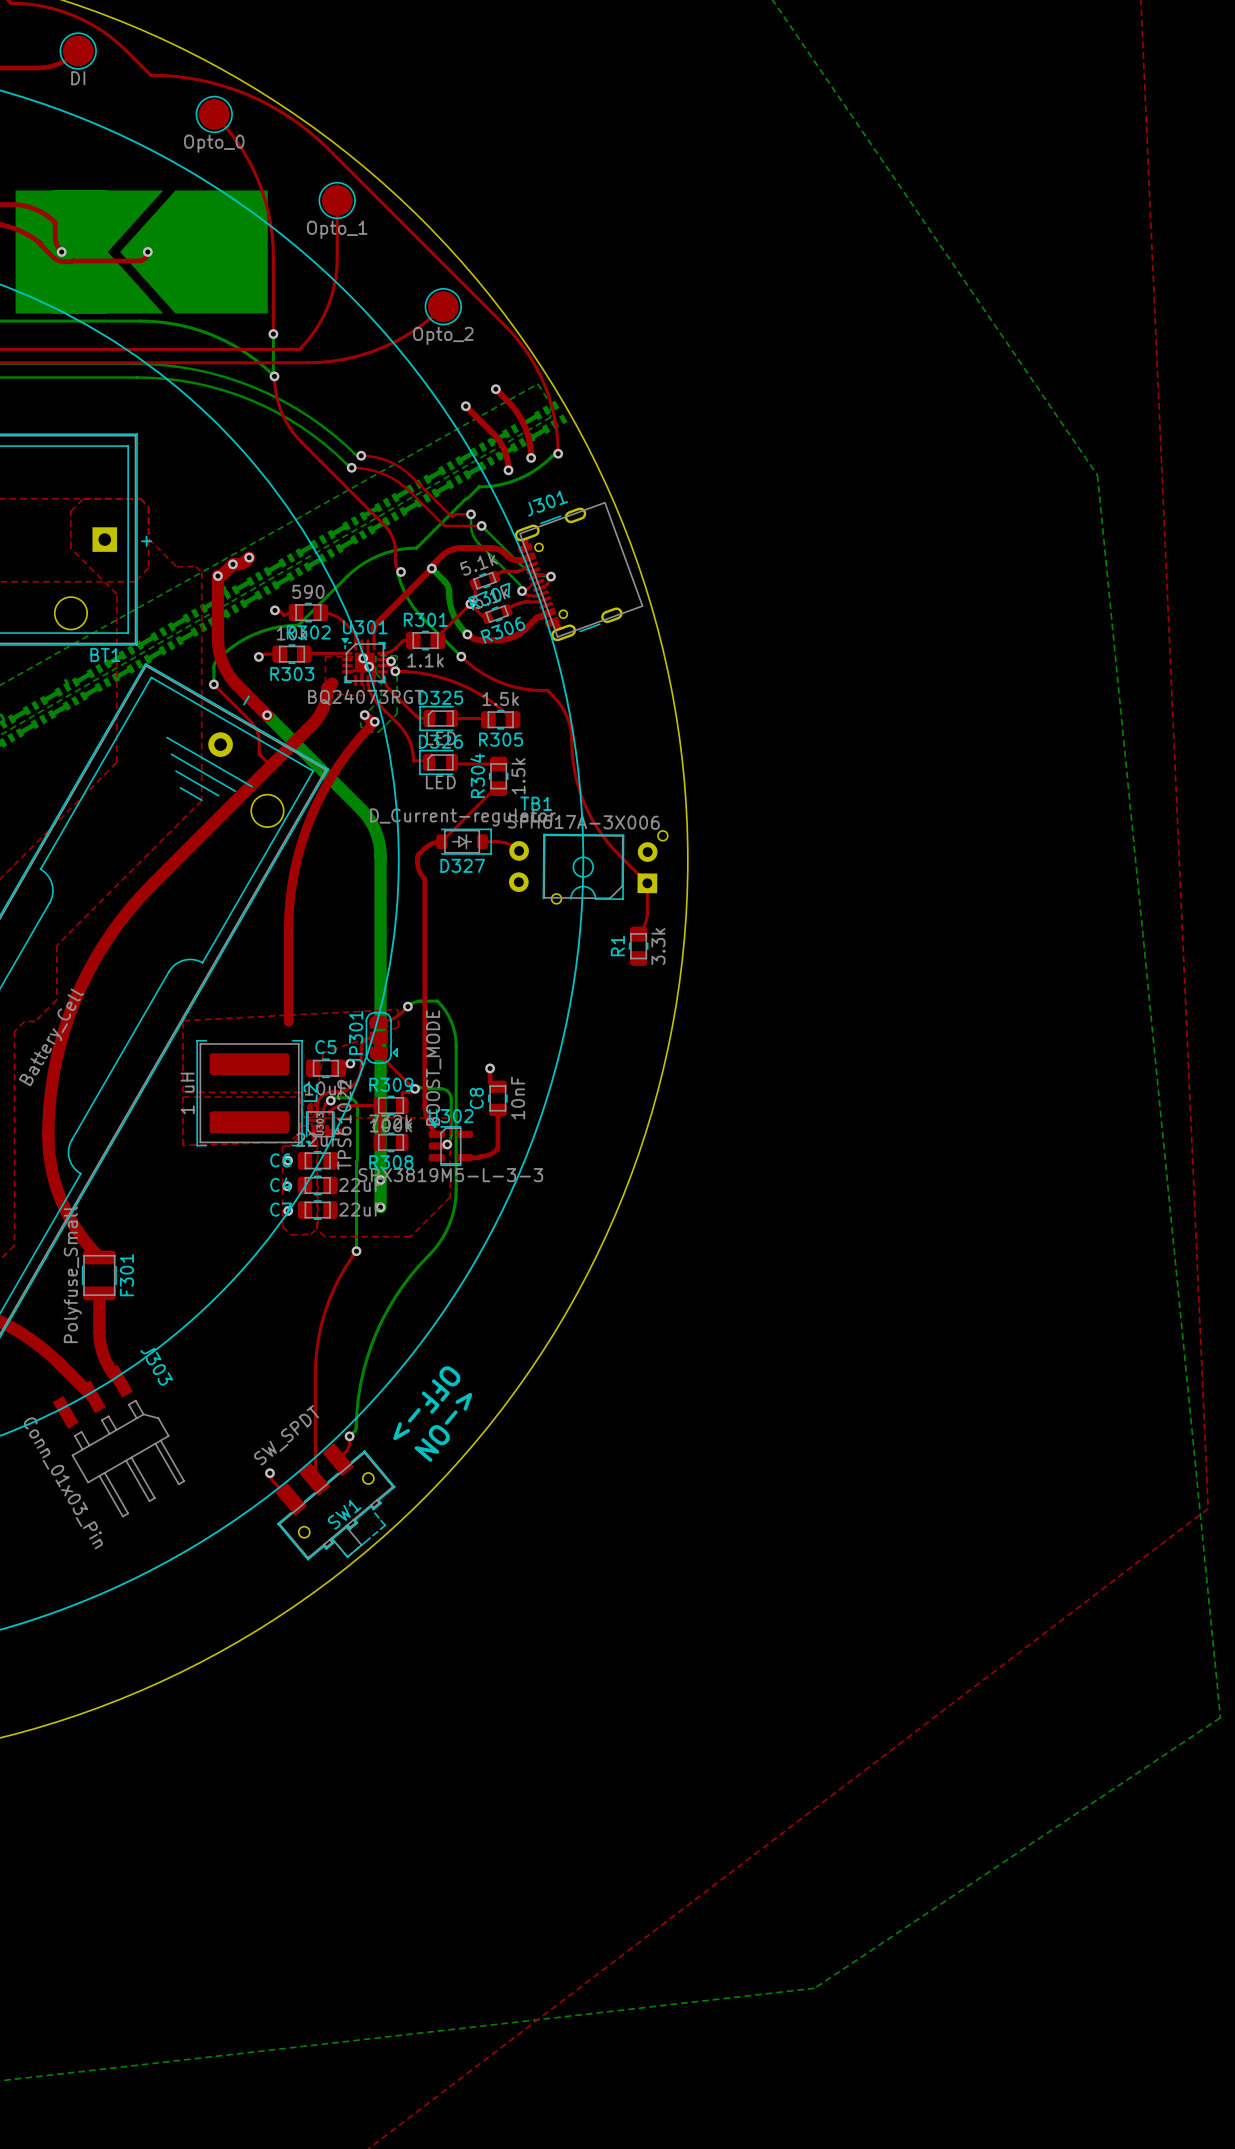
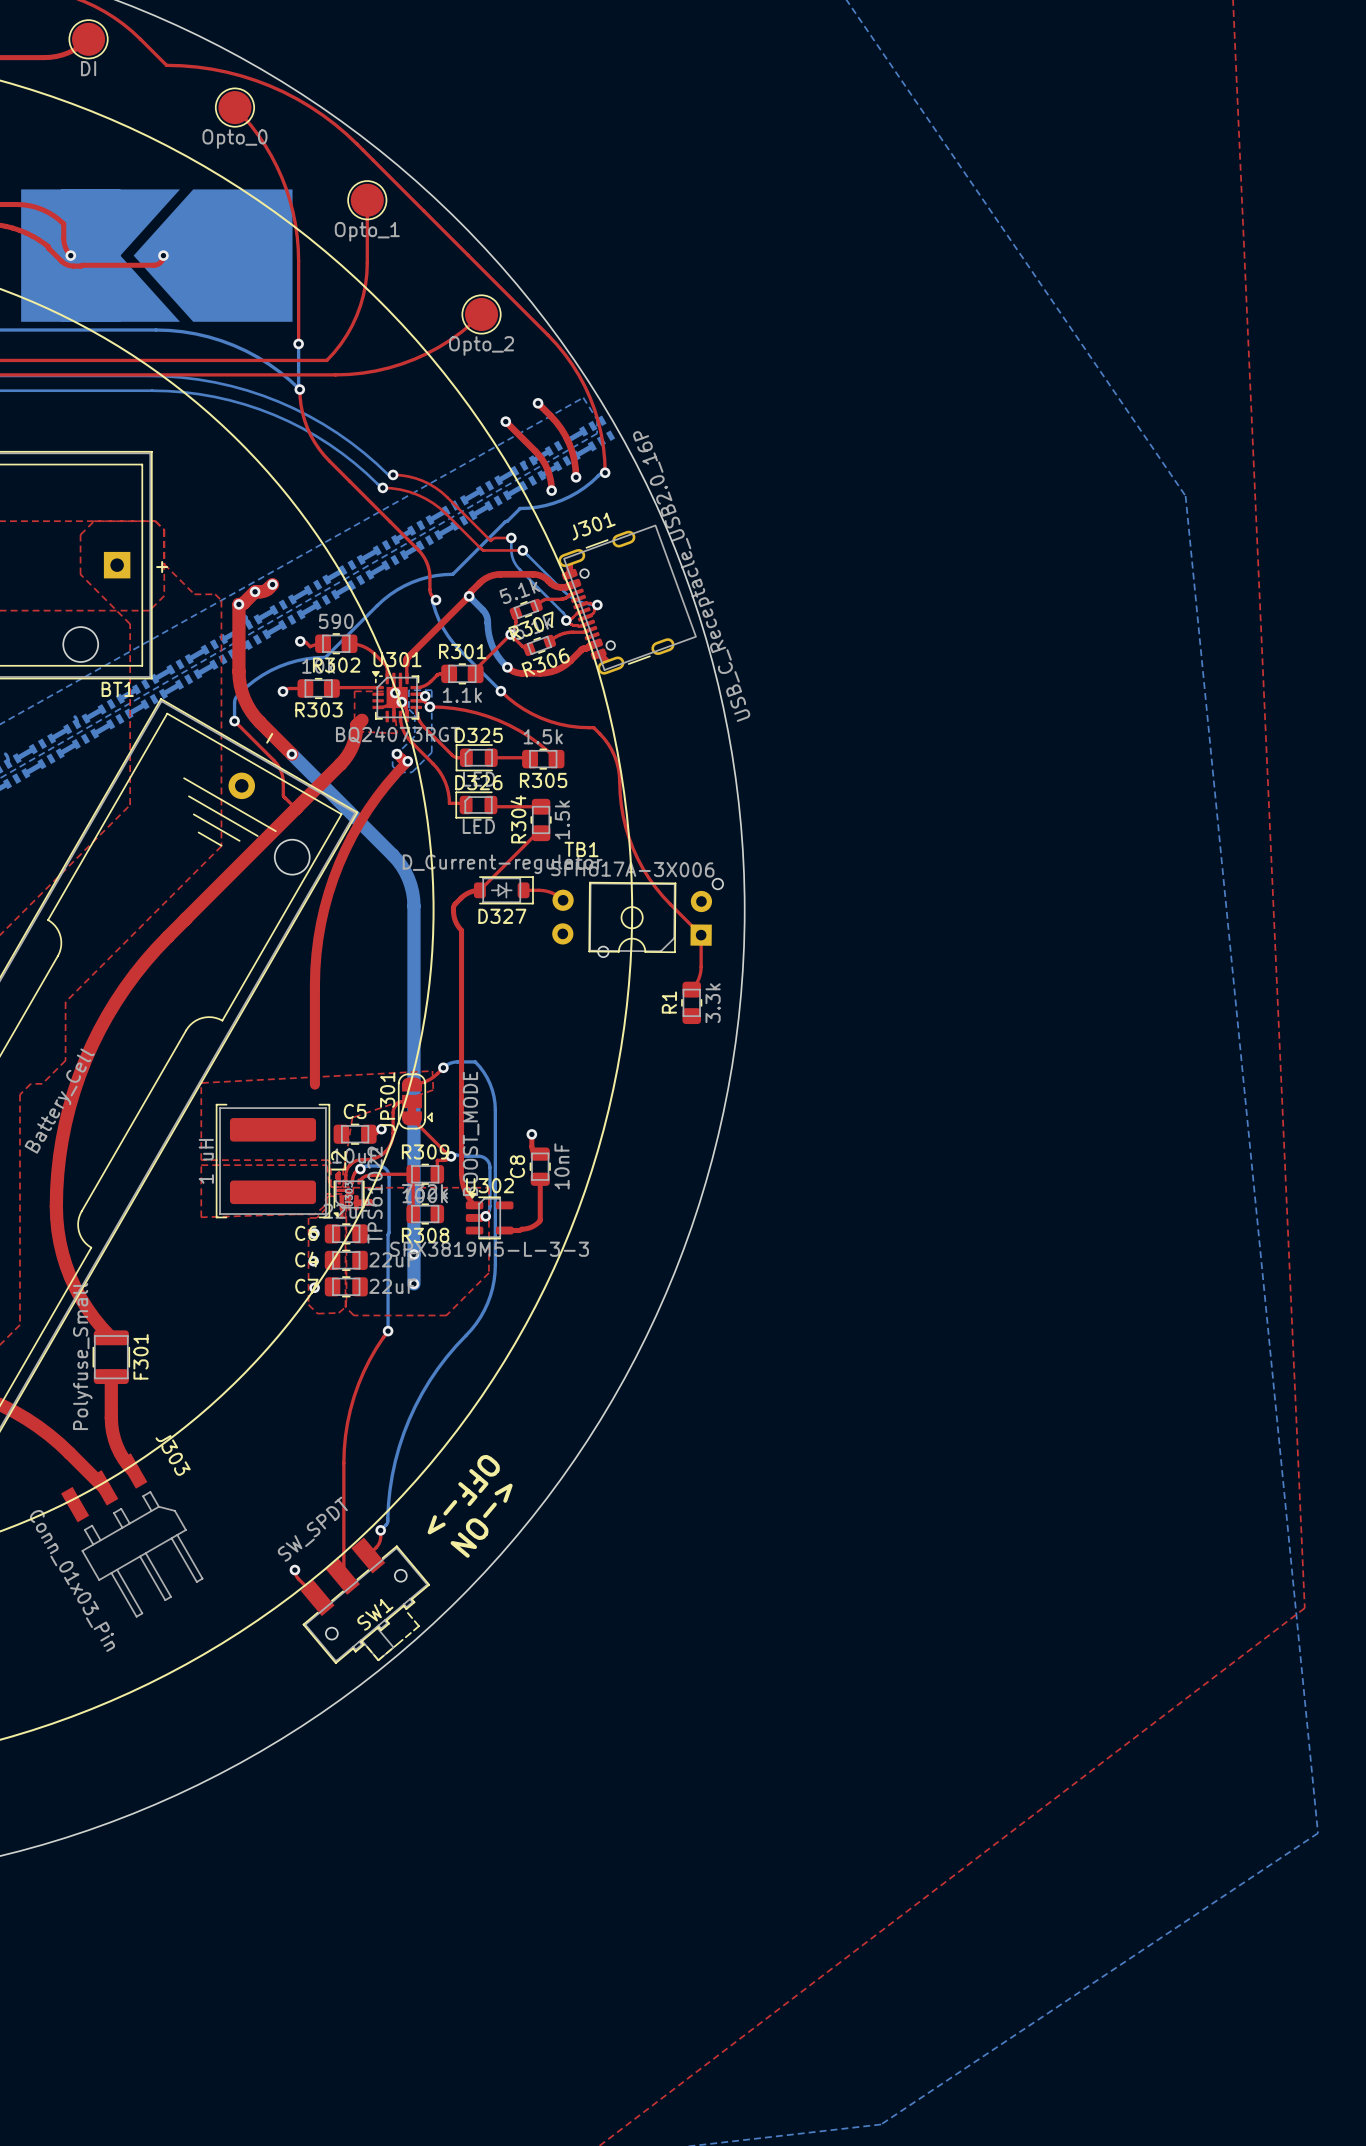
J301 value: none -> USB_C_Receptacle_USB2.0_16P (691, 576)
TB1 footprint: [509, 830, 668, 904] -> [552, 878, 724, 958]

